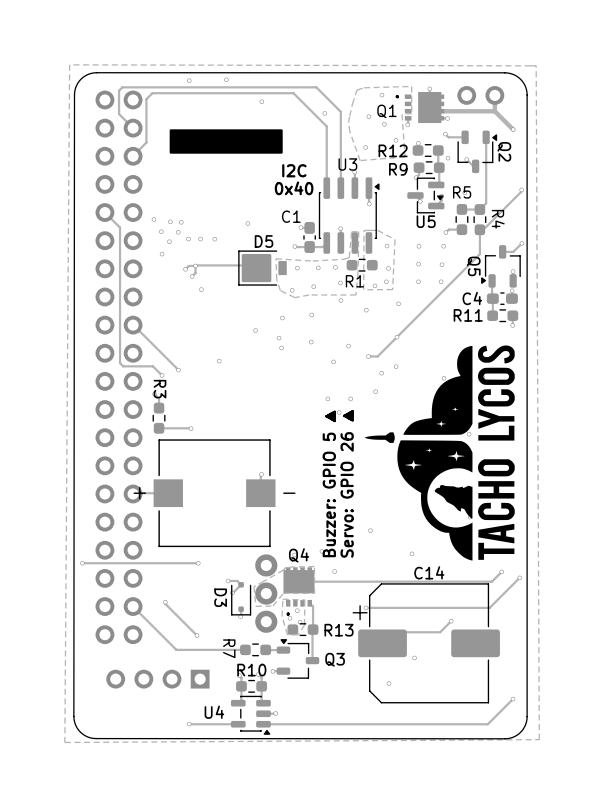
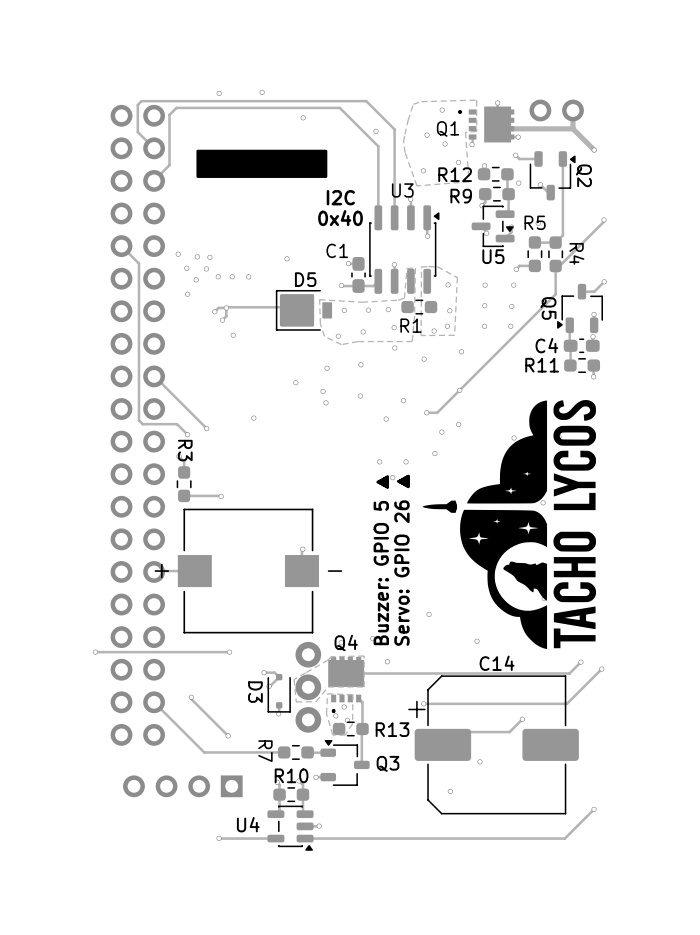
zone outline: (69, 64) (536, 65) (539, 739) (64, 742) (69, 64) -> none
board edge: (96, 72) (504, 72) (516, 76) (523, 83) (527, 94) (527, 716) (524, 726) (516, 735) (504, 738) (96, 738) (84, 735) (76, 727) (73, 716) (74, 94) (75, 87) (80, 79) (87, 74) (96, 72) -> none

